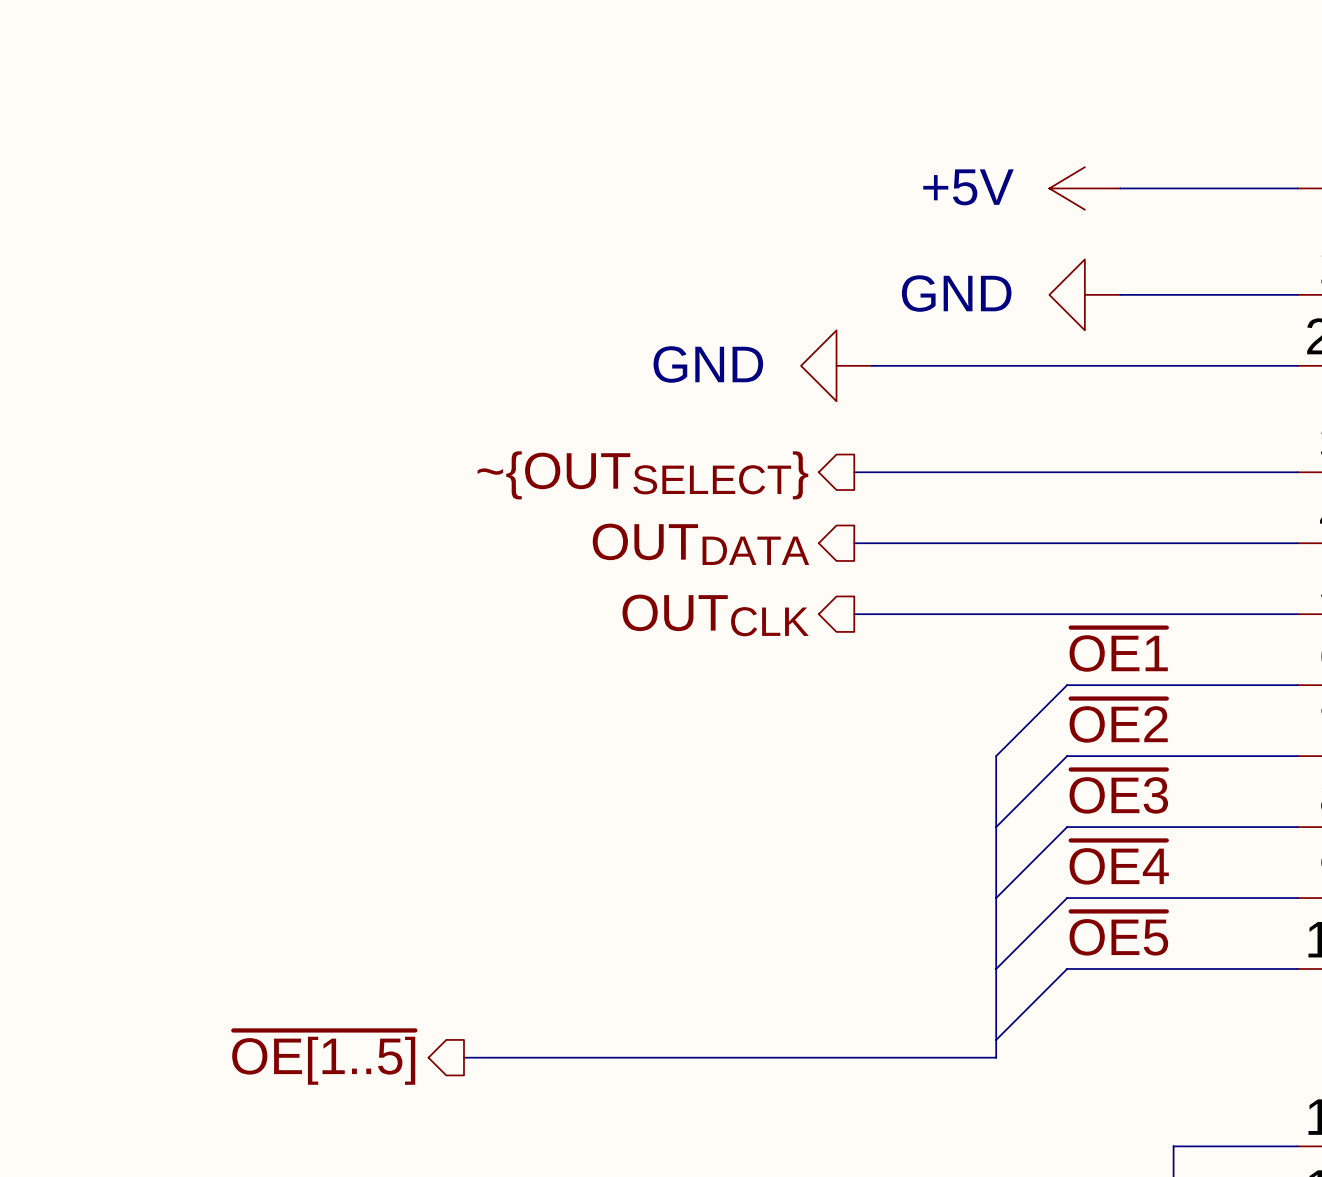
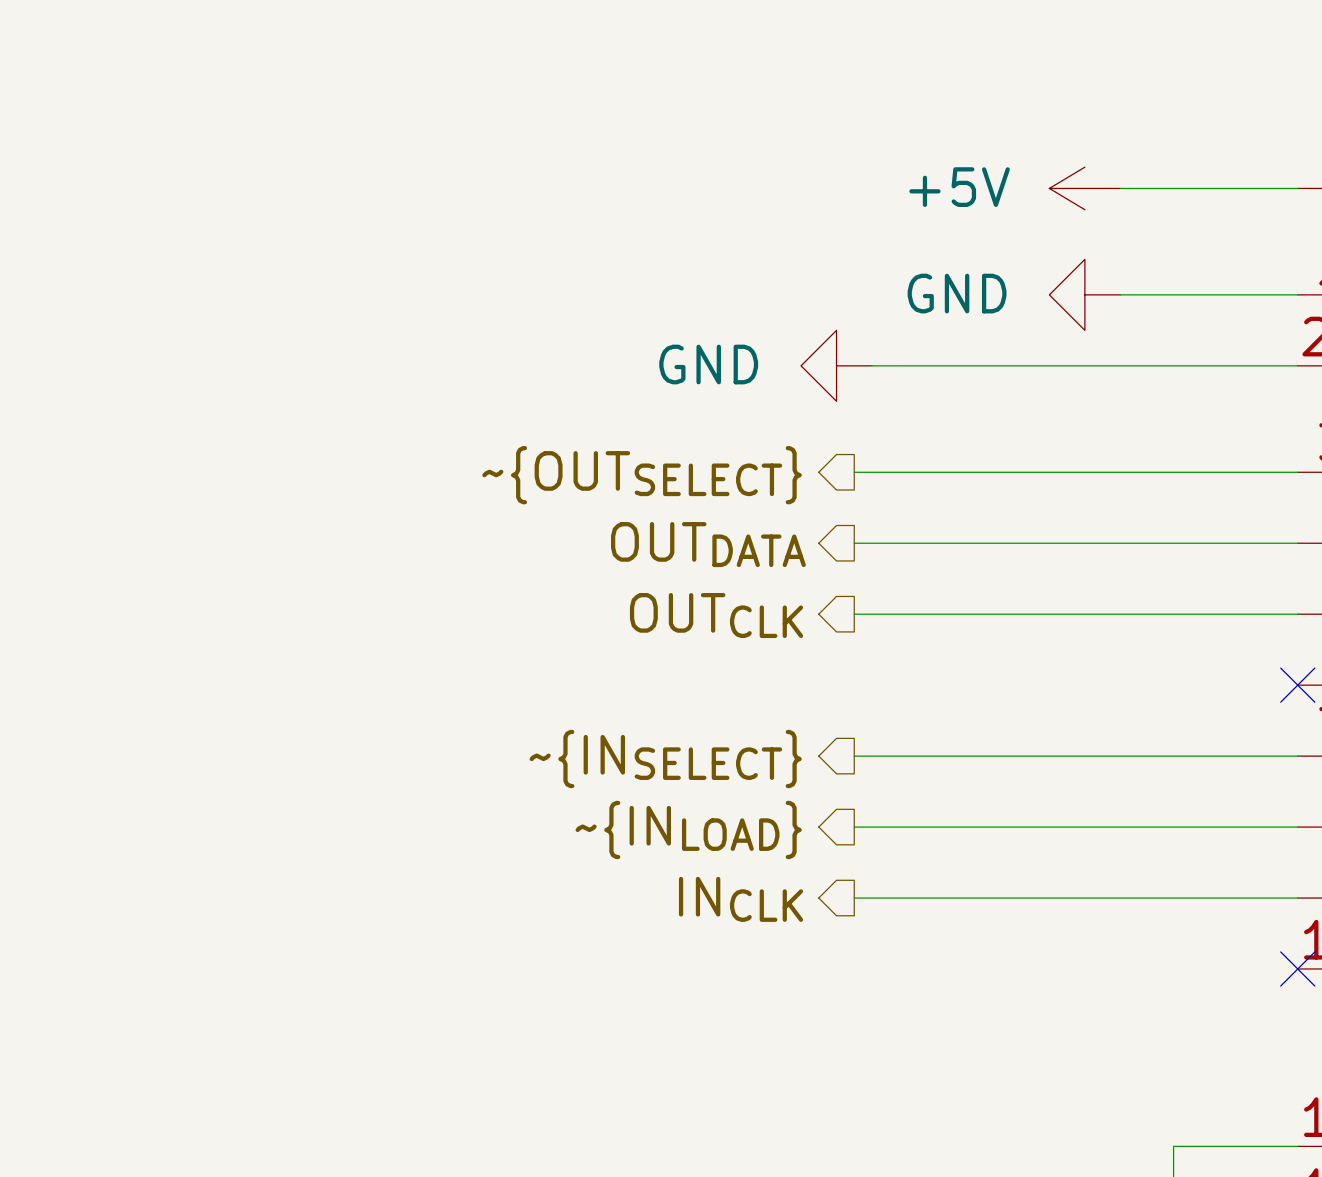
label: ~{OE1} (1118, 649) -> none
wire: (1297, 685) (1067, 685) (996, 756) -> none
no-connect mark: none -> (1297, 685)
label: ~{OE2} (1118, 720) -> none
bus: (996, 756) (996, 1057) (463, 1057) -> none
wire: (1067, 756) (996, 827) -> (1067, 756) (854, 756)
hierarchical label: none -> ~{INSELECT} (665, 759)
label: ~{OE3} (1118, 791) -> none
wire: (1067, 827) (996, 898) -> (1067, 827) (854, 827)
hierarchical label: none -> ~{INLOAD} (688, 829)
label: ~{OE4} (1119, 862) -> none
wire: (1067, 898) (996, 968) -> (1067, 898) (854, 898)
hierarchical label: none -> INCLK (741, 899)
label: ~{OE5} (1118, 933) -> none
wire: (1297, 968) (1067, 968) (996, 1039) -> none
no-connect mark: none -> (1297, 968)
hierarchical label: ~{OE[1..5]} (323, 1057) -> none

